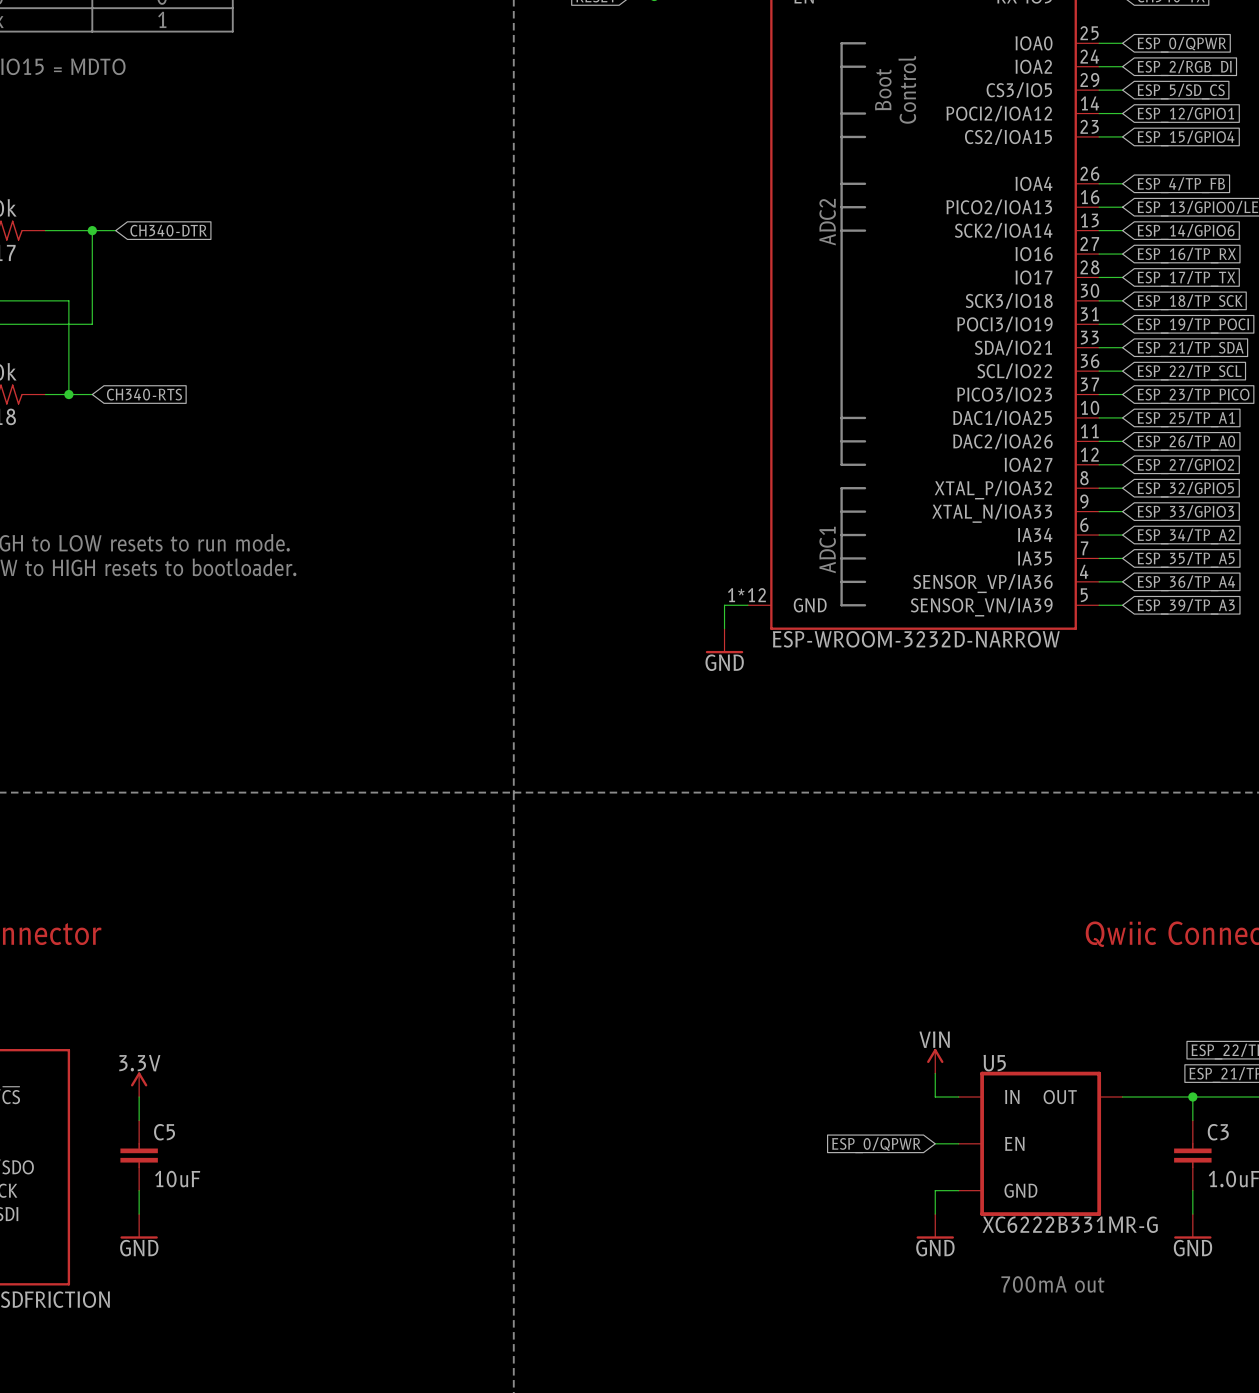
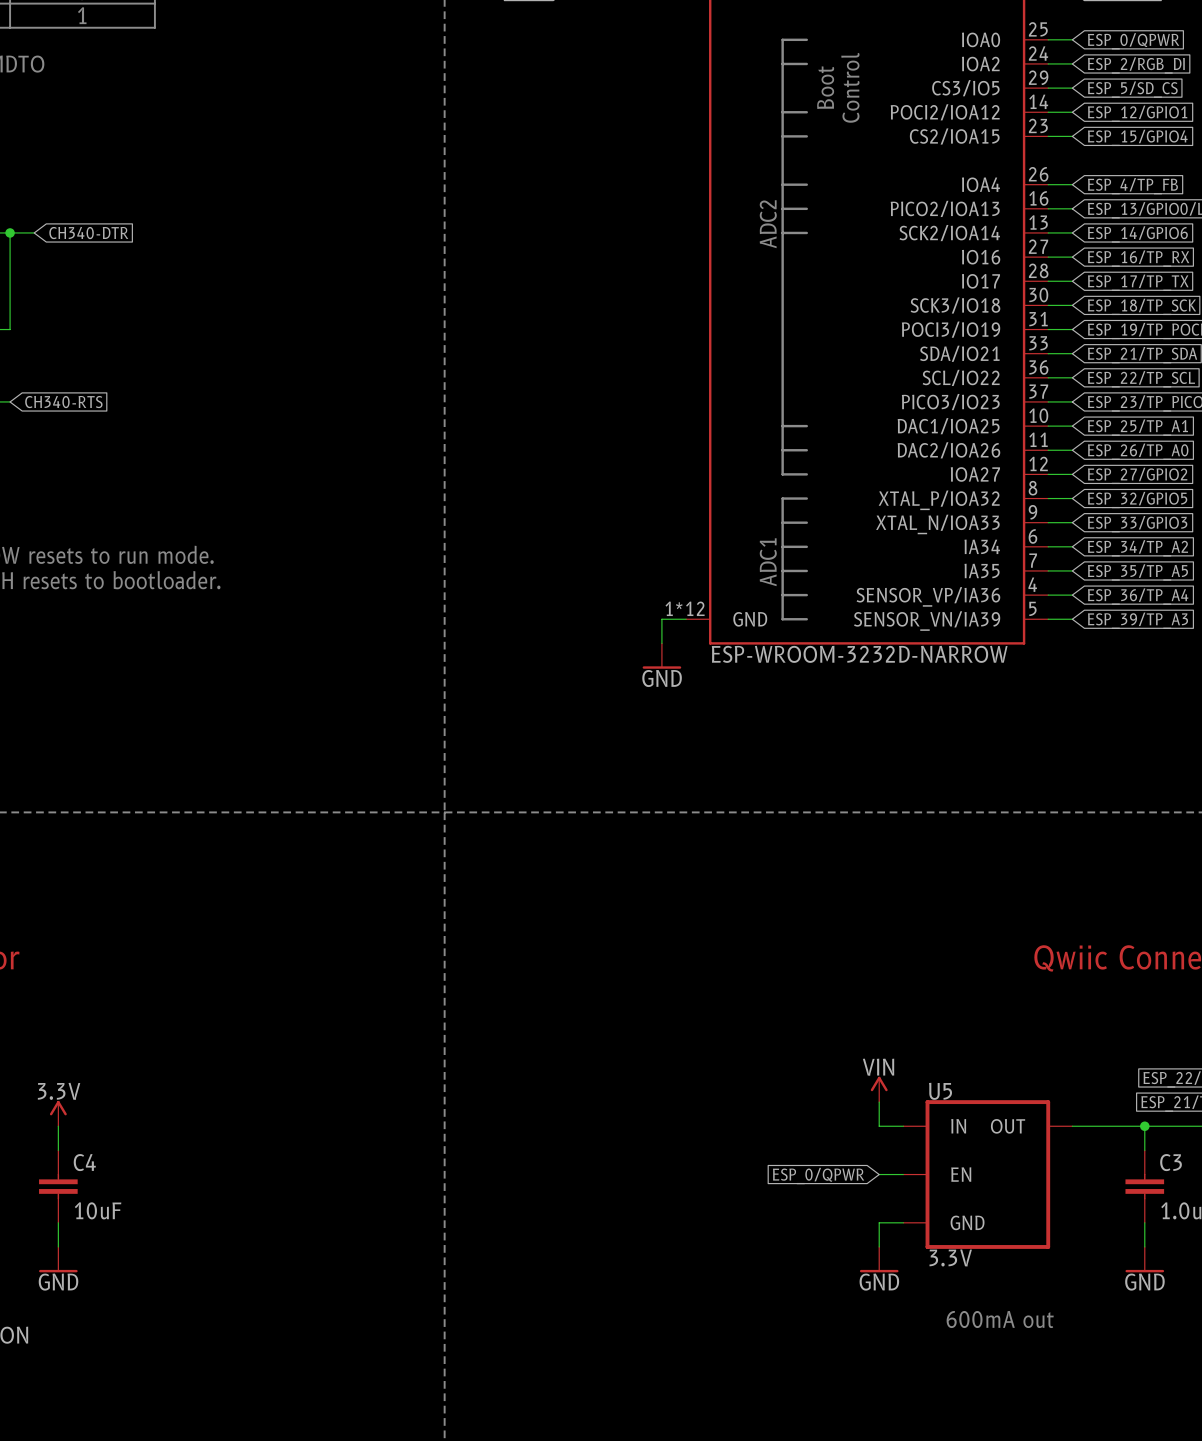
C5 name: C5 (164, 1132) -> C4 (84, 1162)
U5 value: XC6222B331MR-G (1070, 1224) -> 3.3V (950, 1257)
text: 700mA out (1052, 1284) -> 600mA out (1000, 1319)

